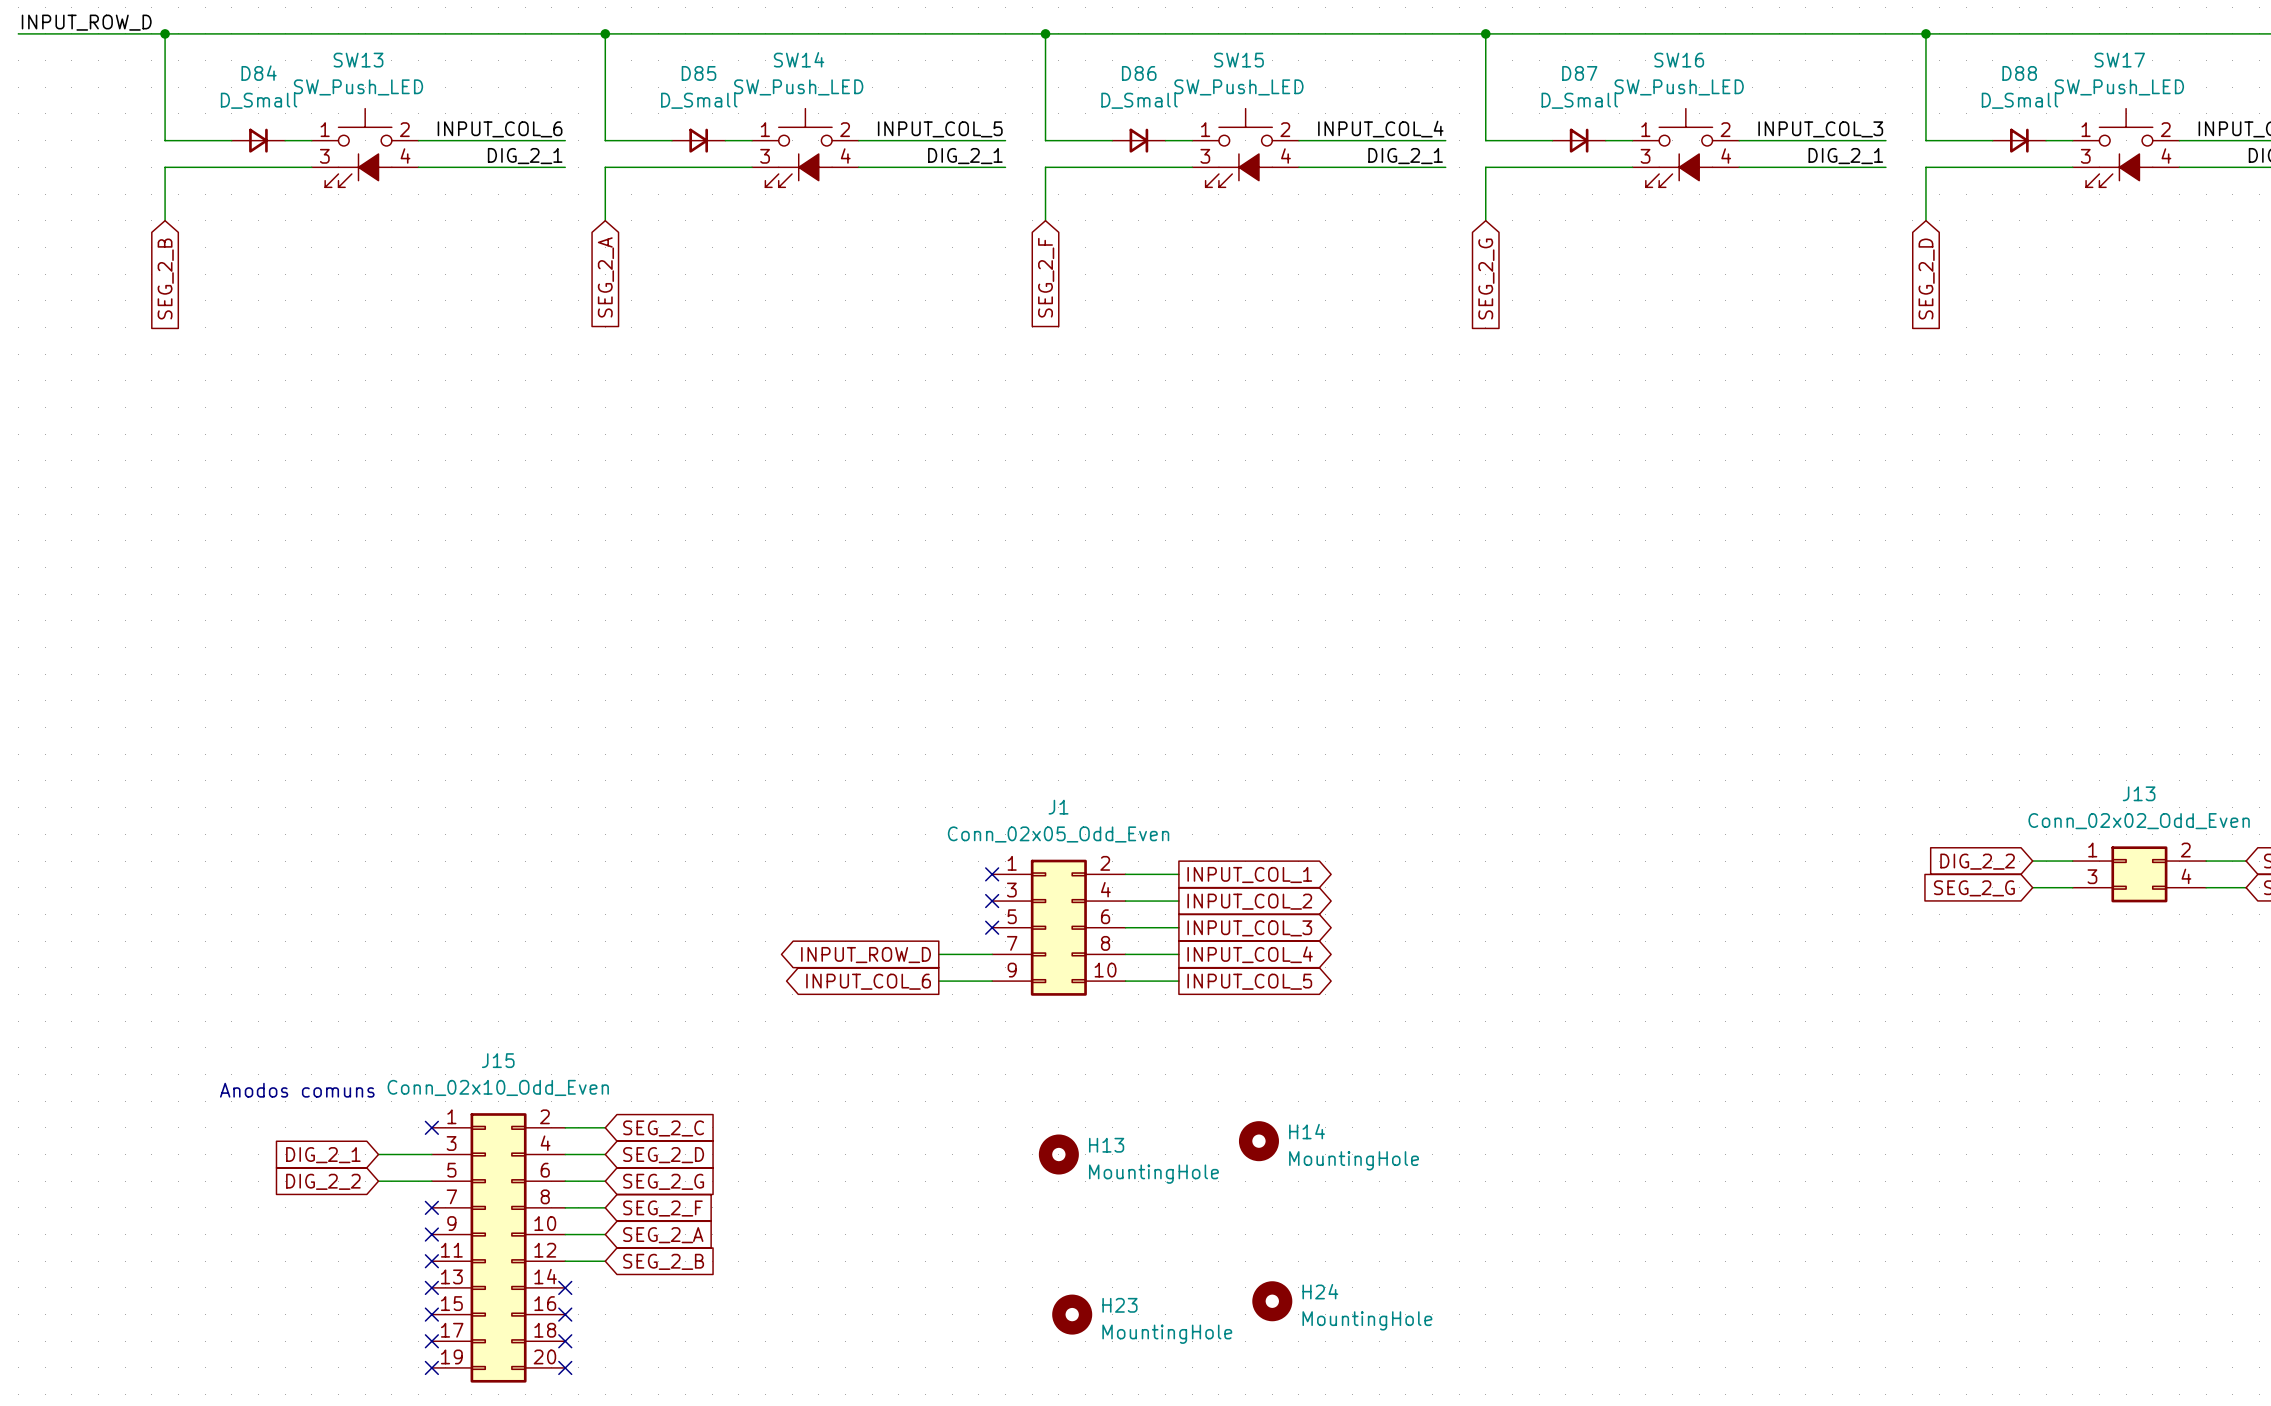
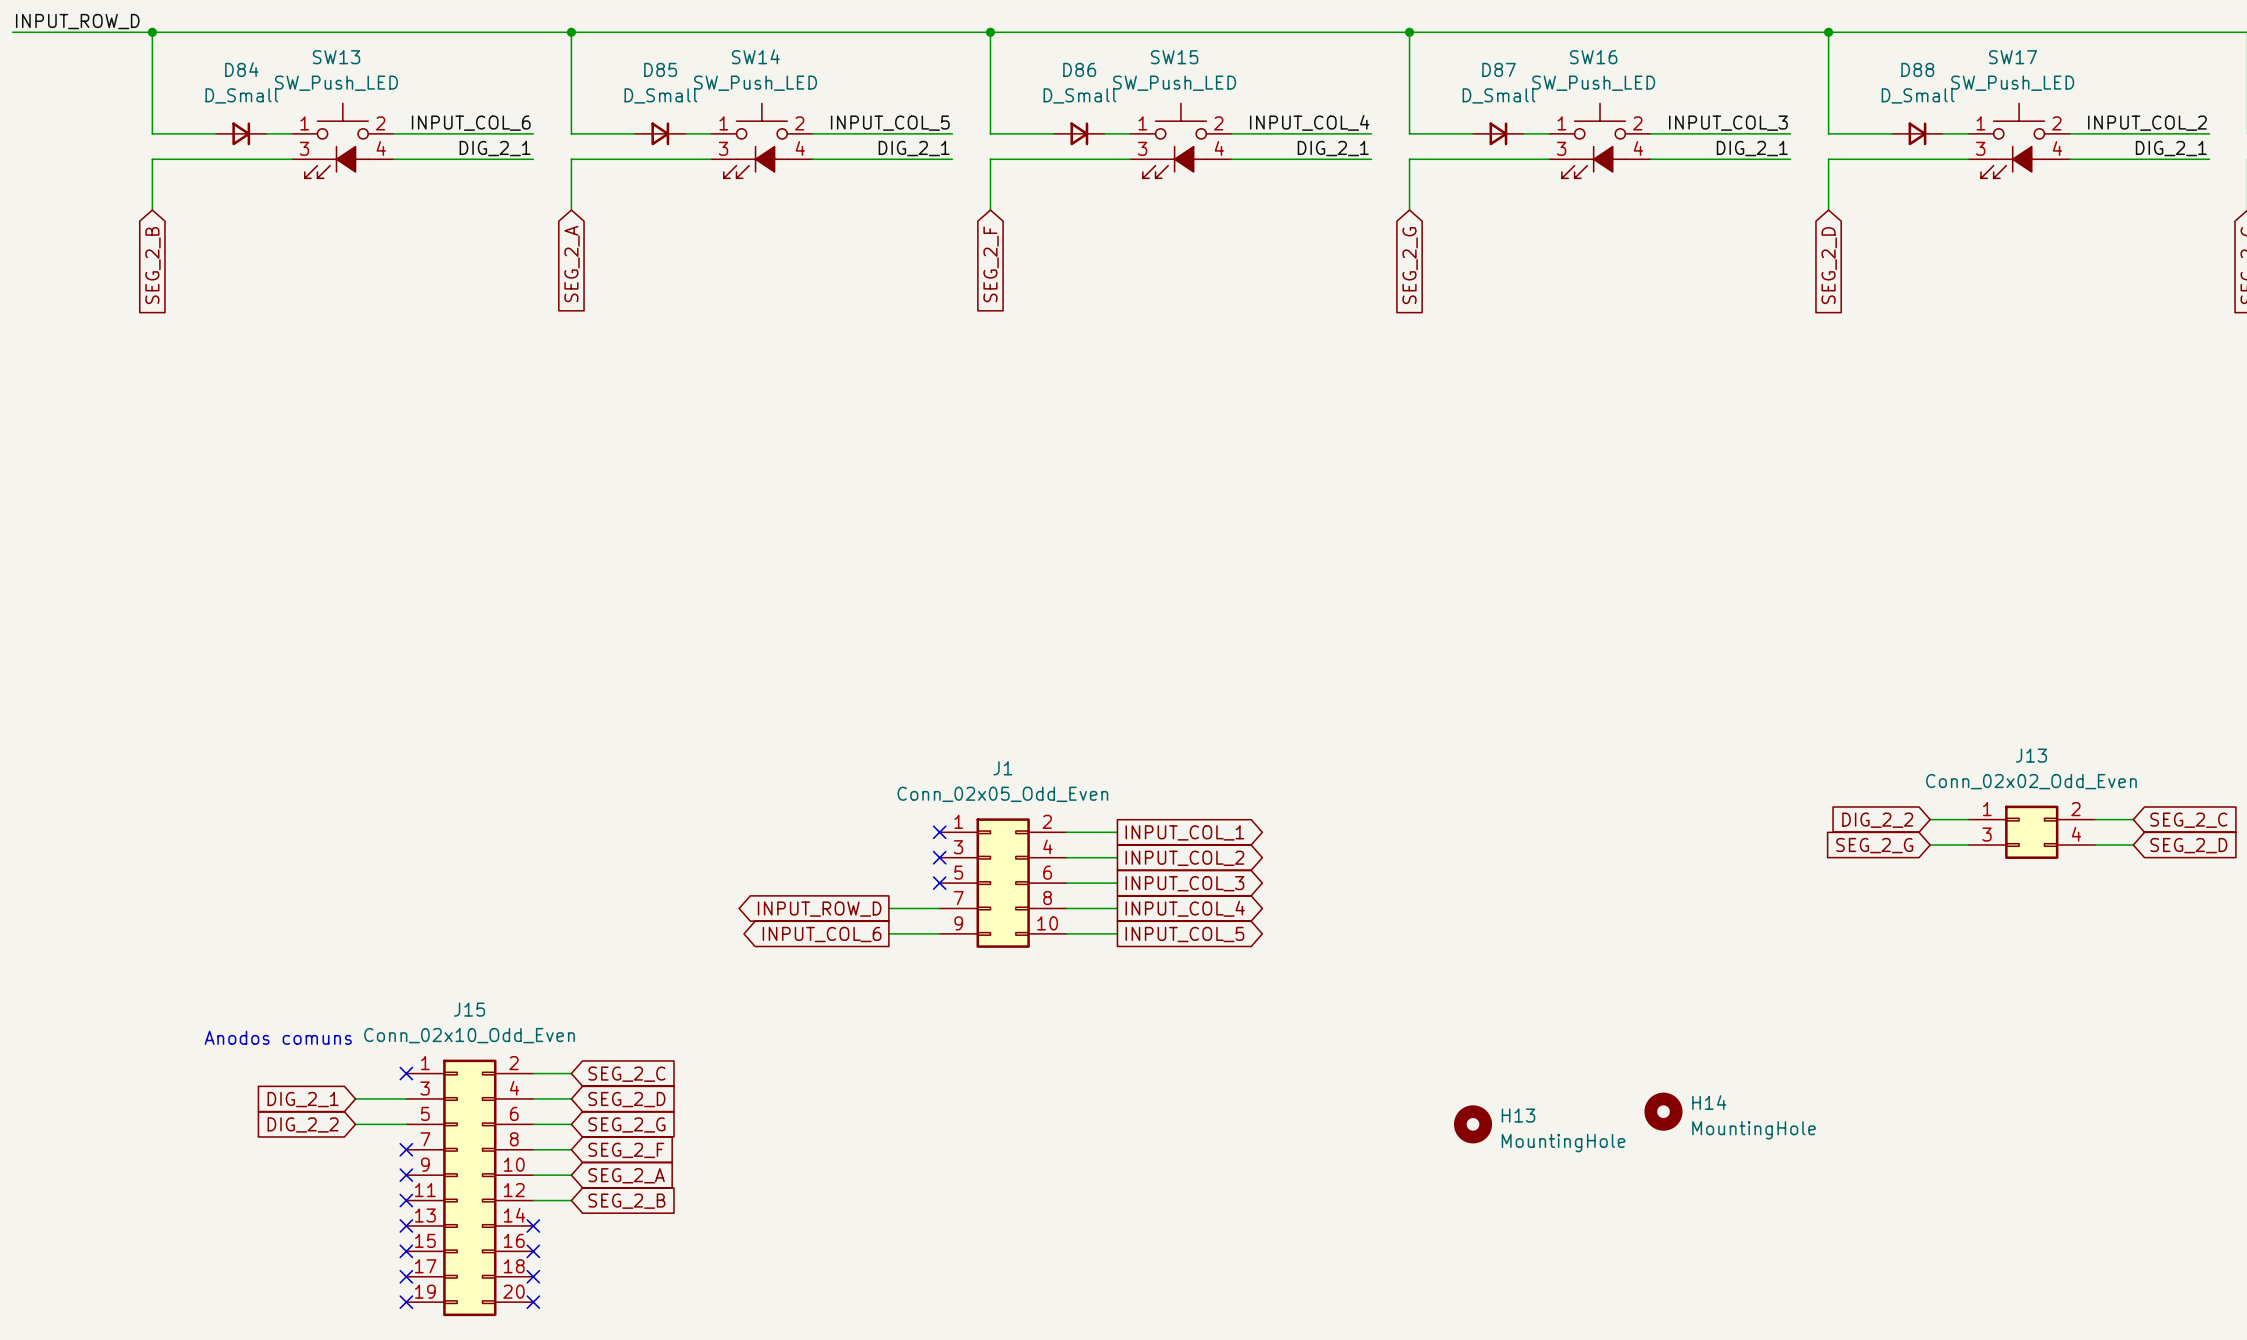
H14 position: (1258, 1141) -> (1663, 1111)
H13 position: (1058, 1154) -> (1473, 1124)
H24: MountingHole (1272, 1301) -> none
H23: MountingHole (1072, 1314) -> none

